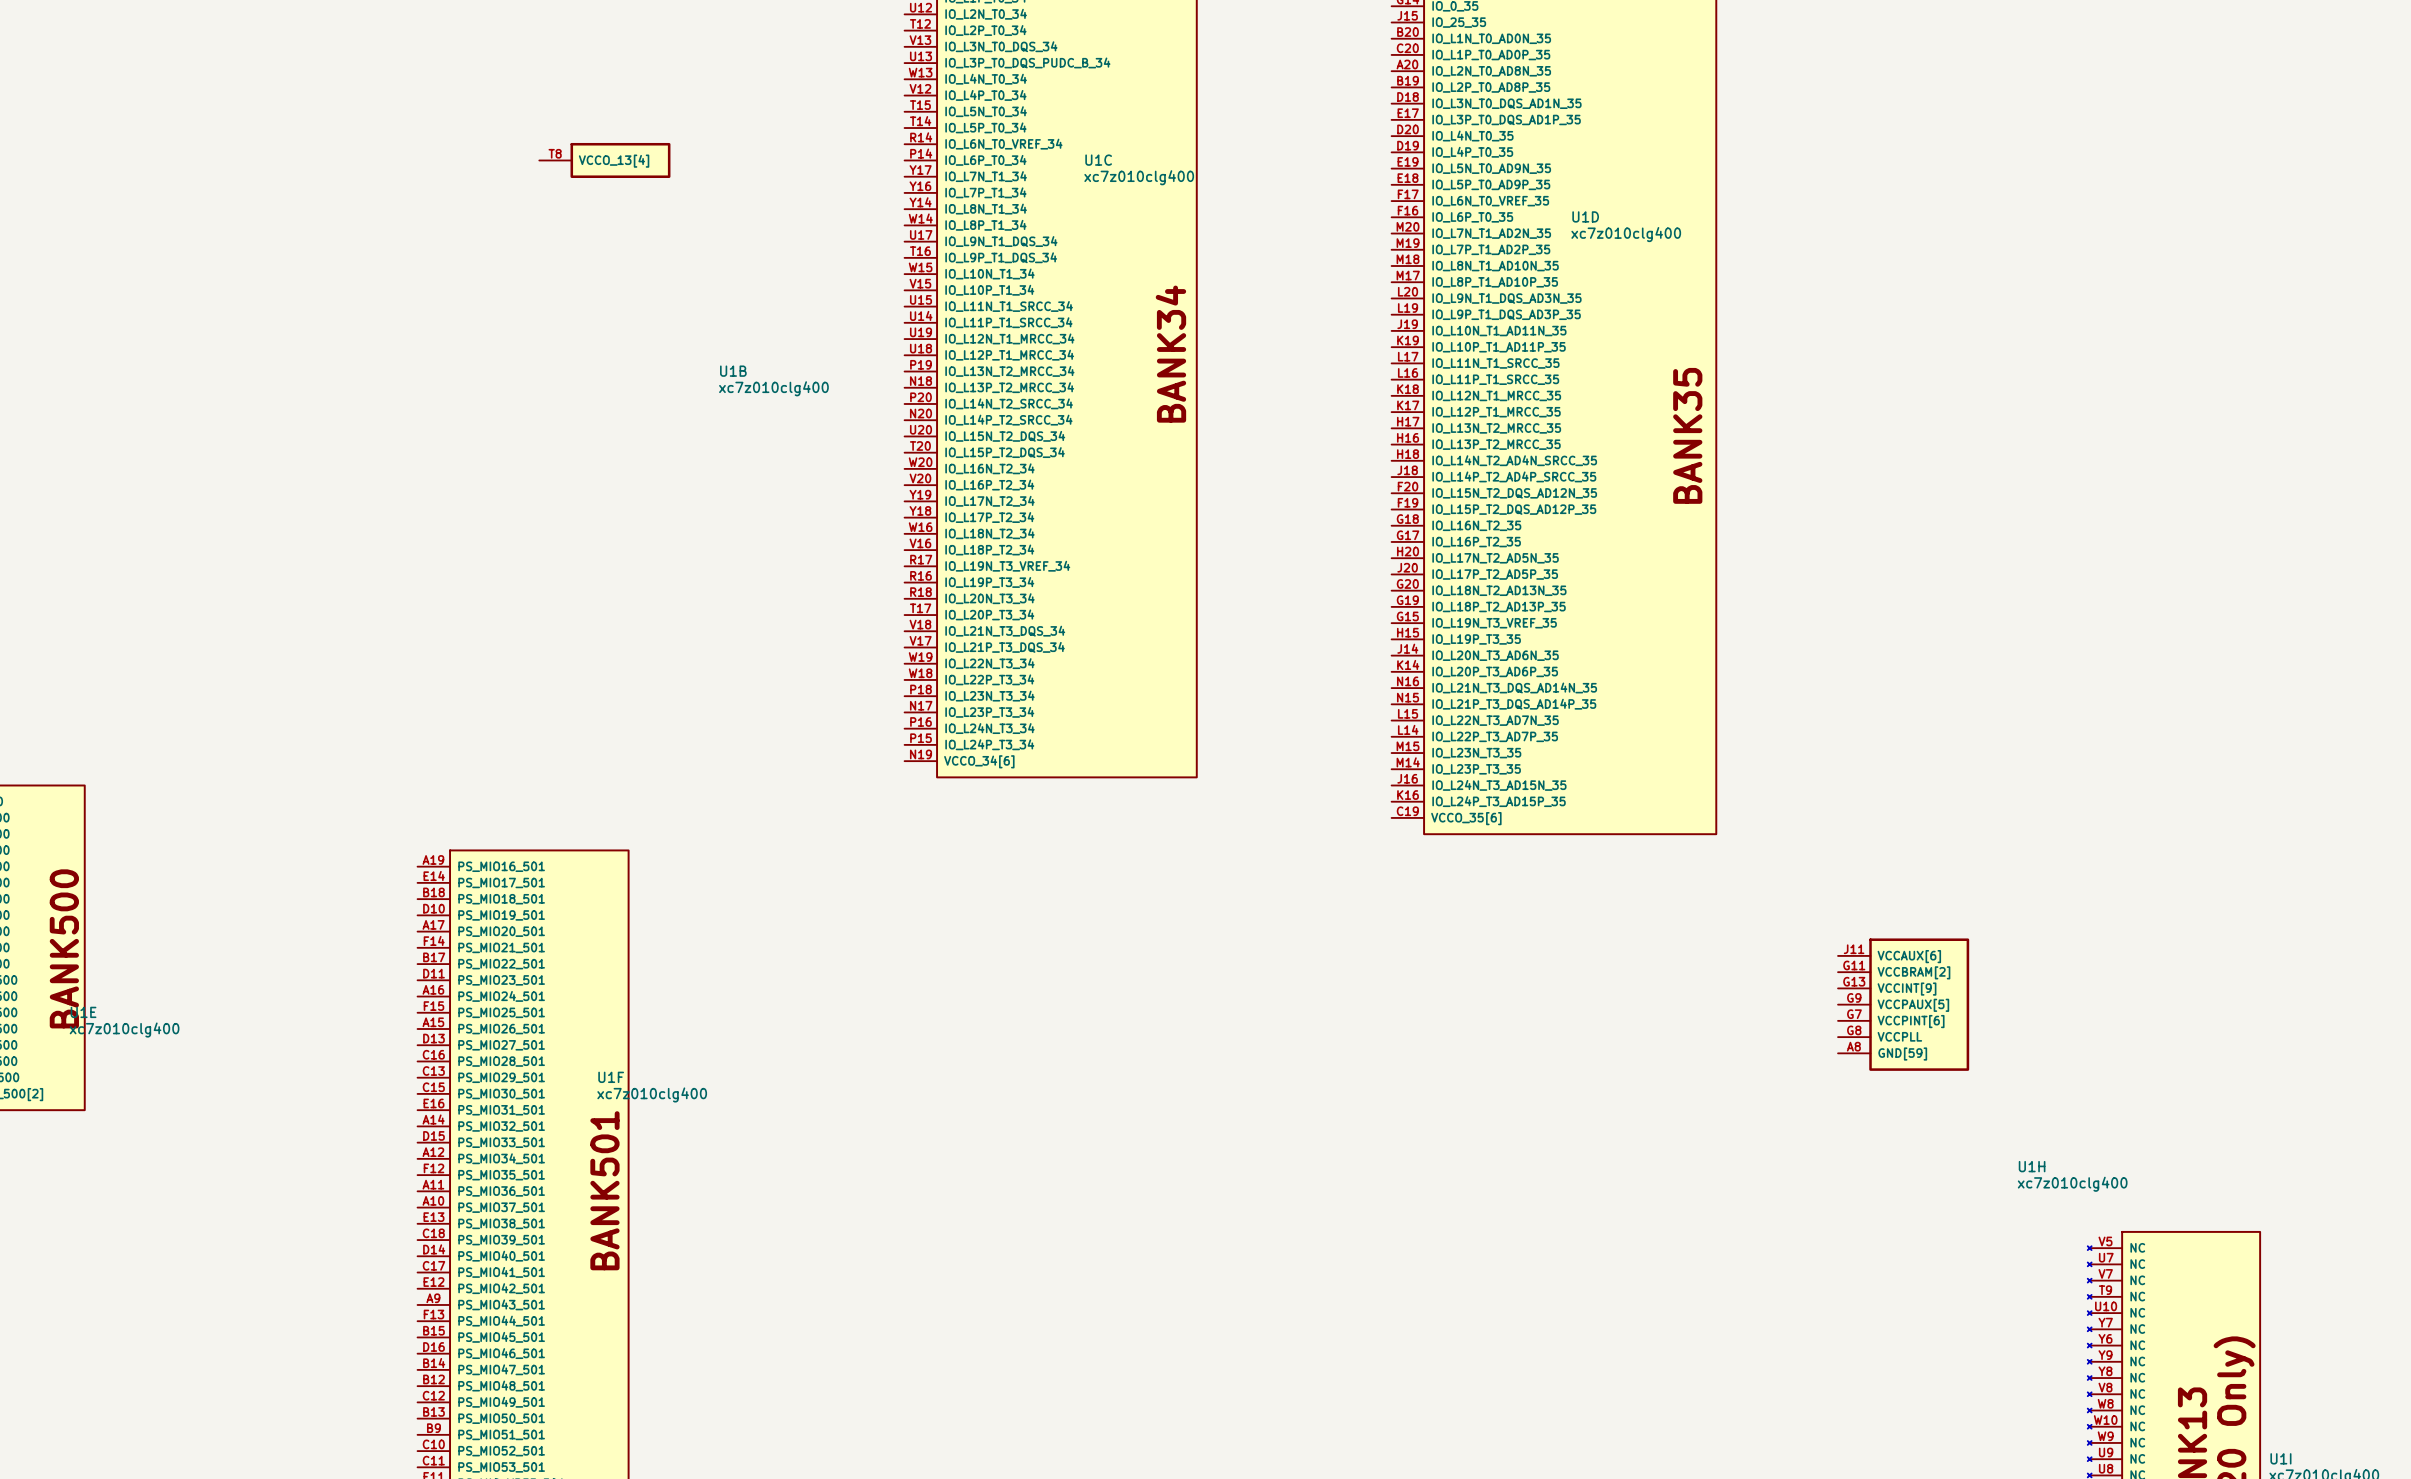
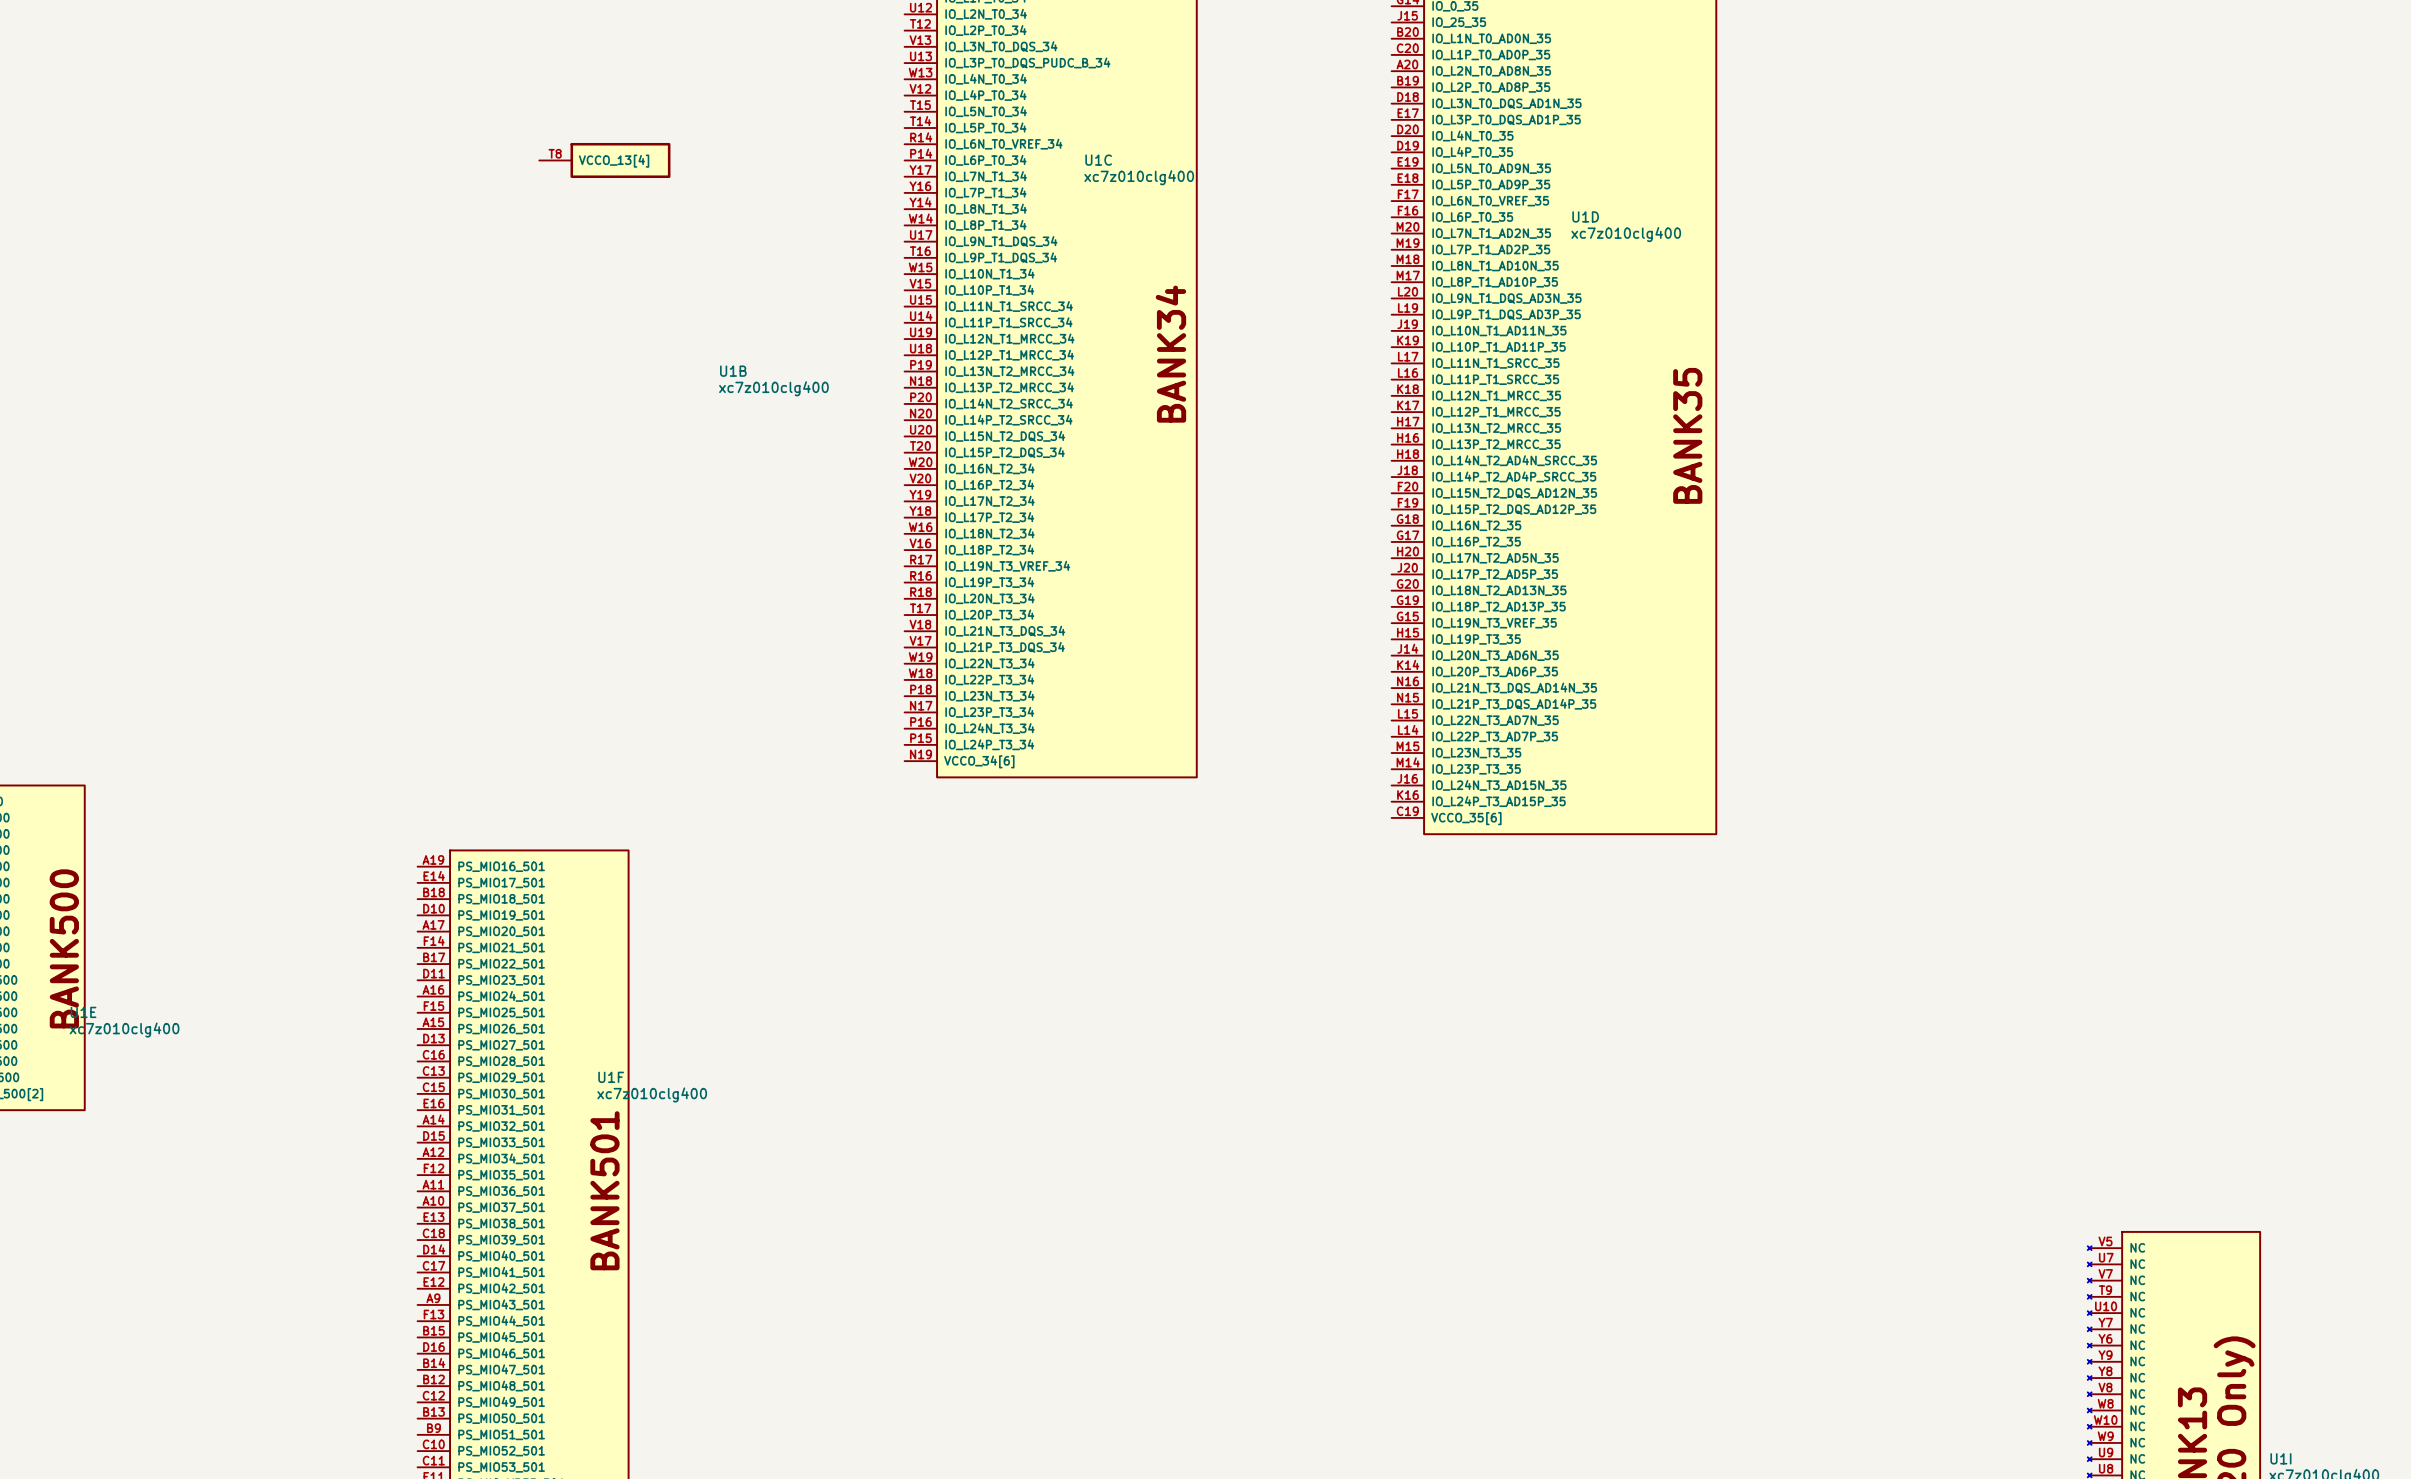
U1H: xc7z010clg400 (1903, 1004) -> none

